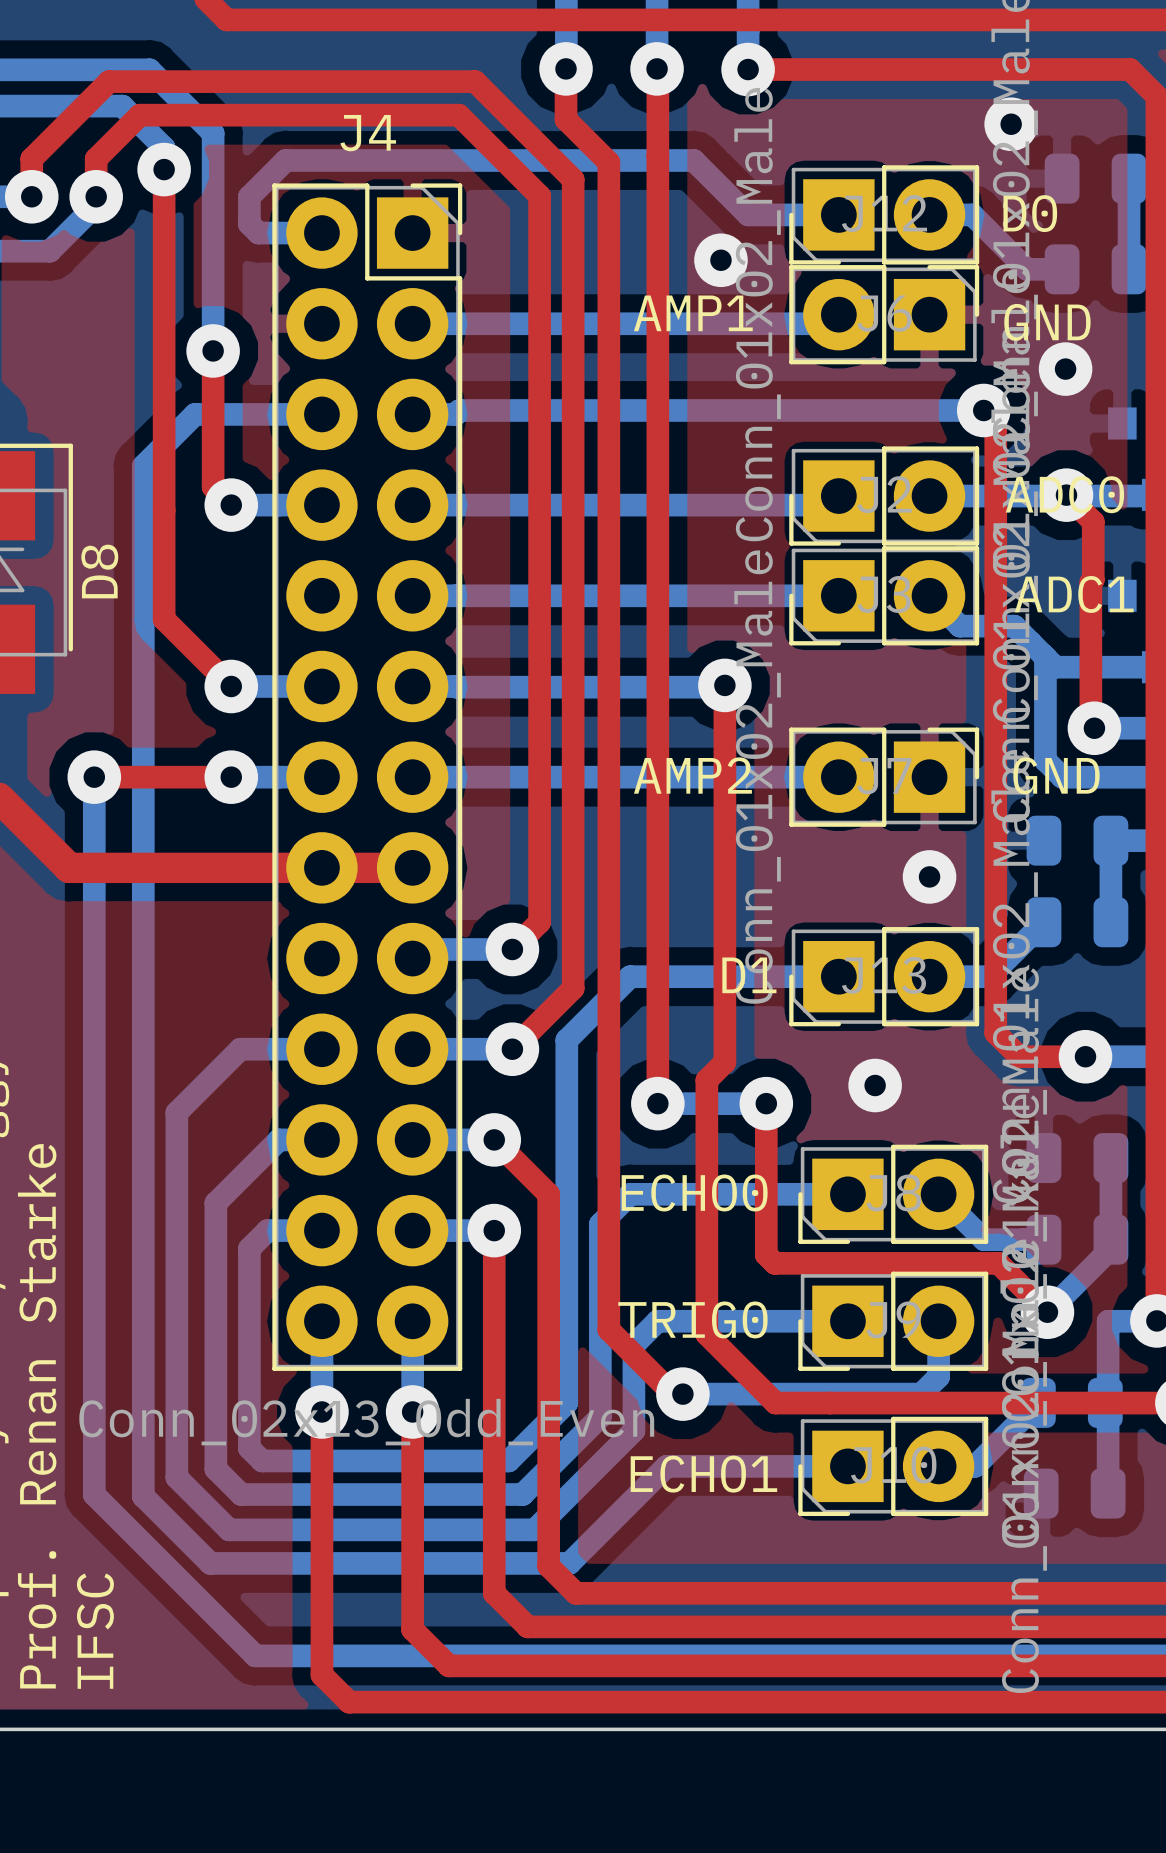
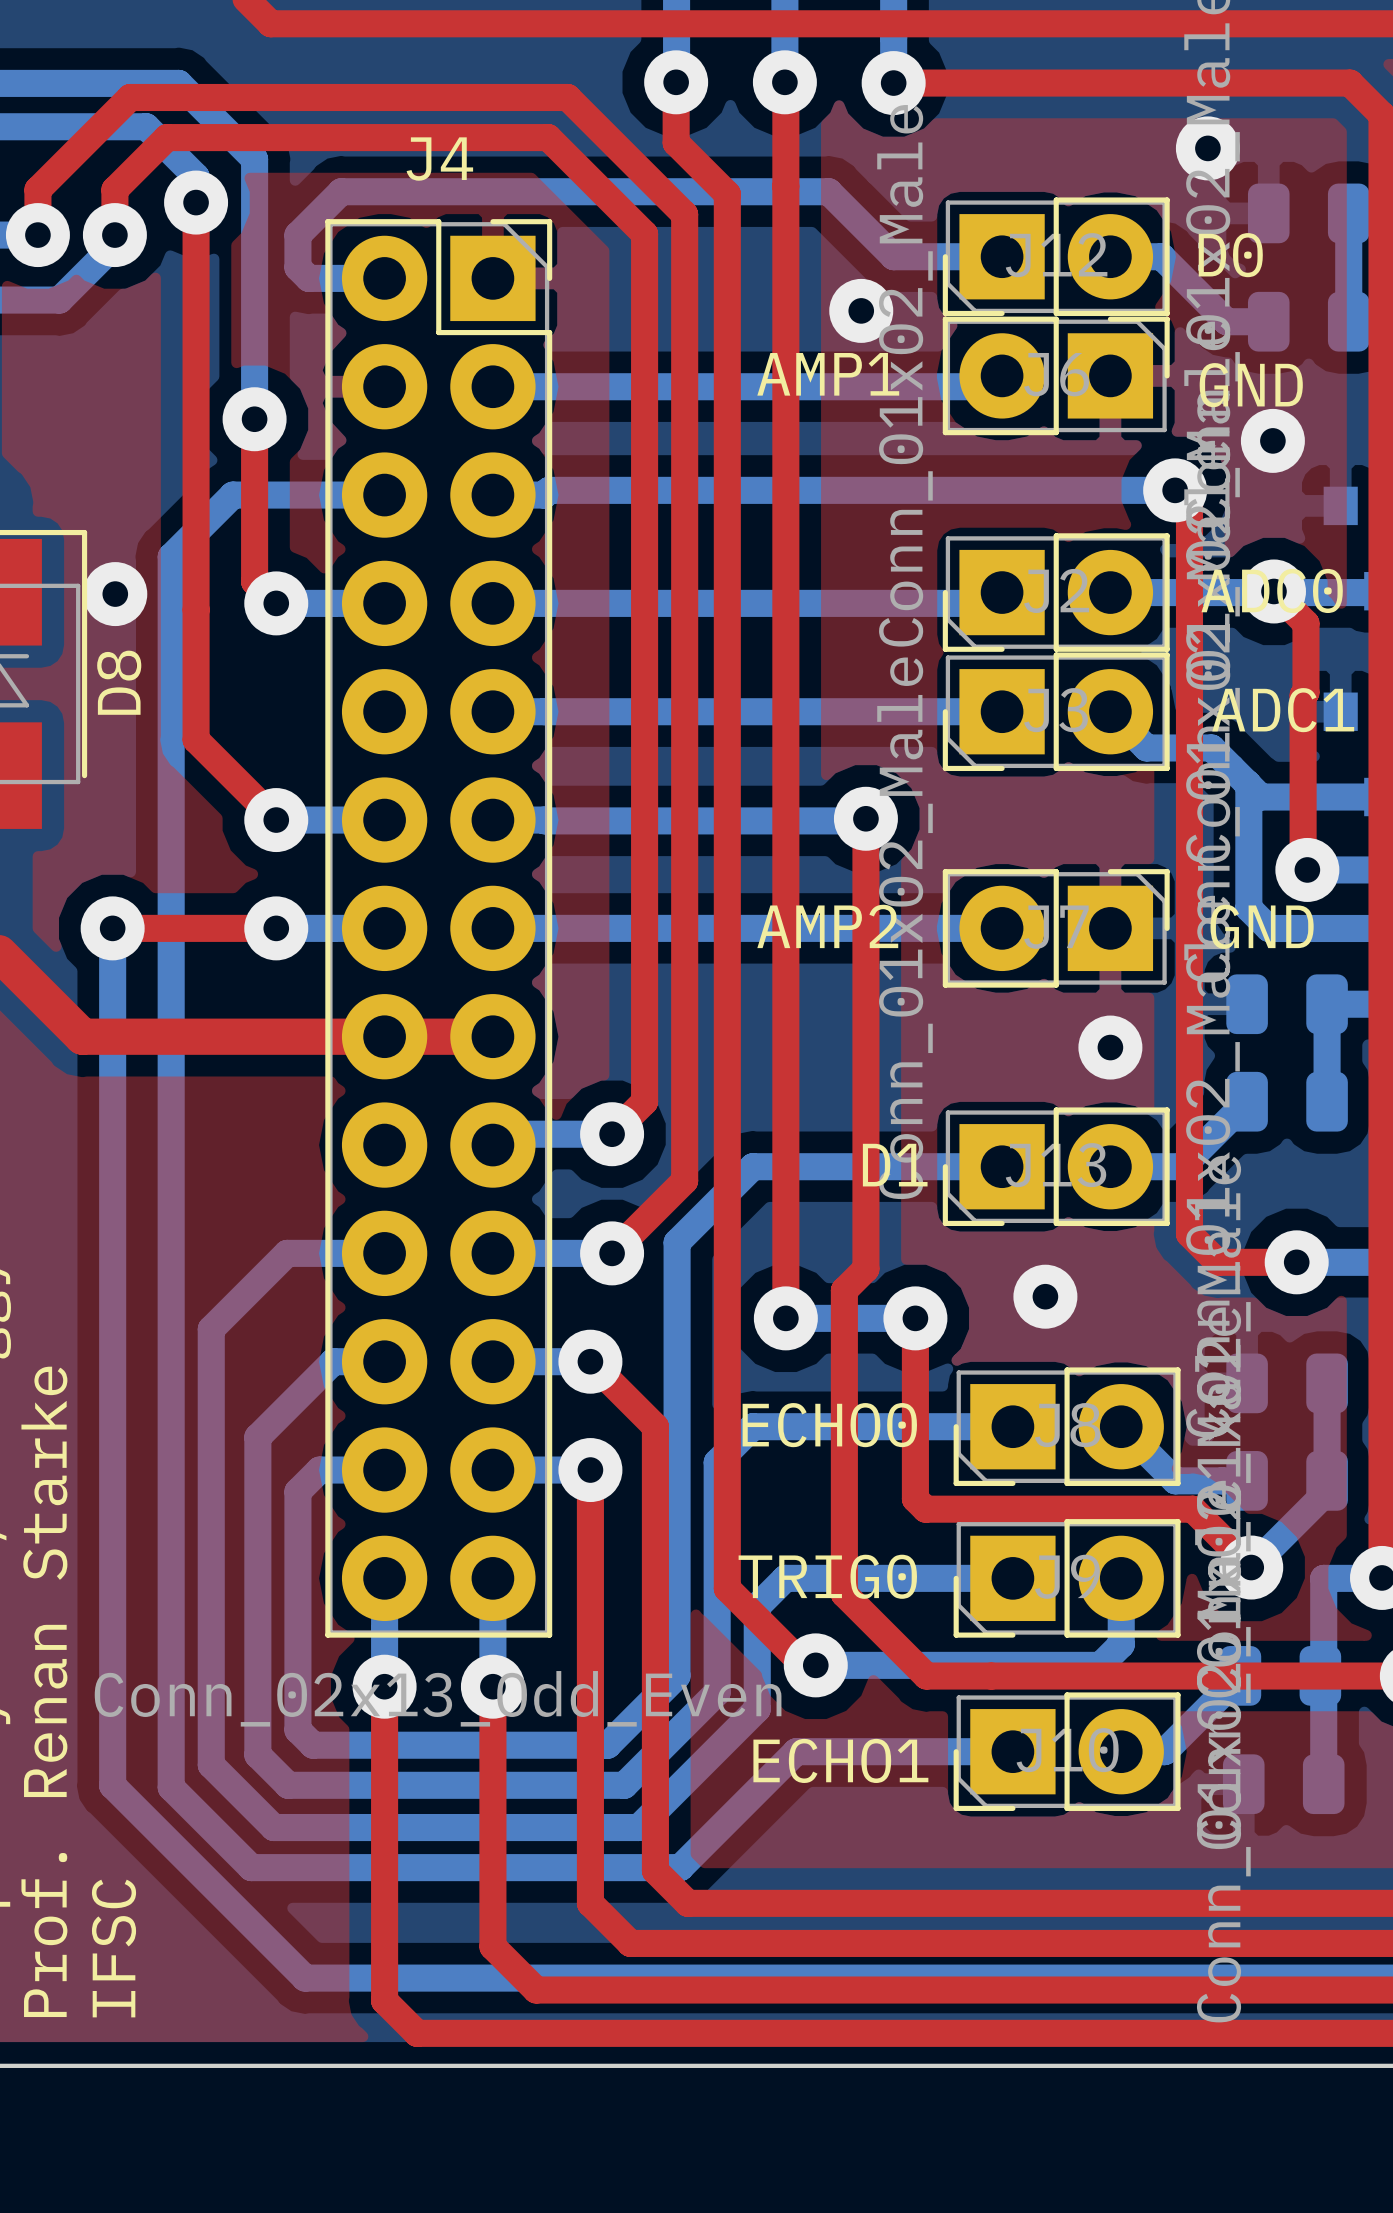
via: none -> (115, 594)

